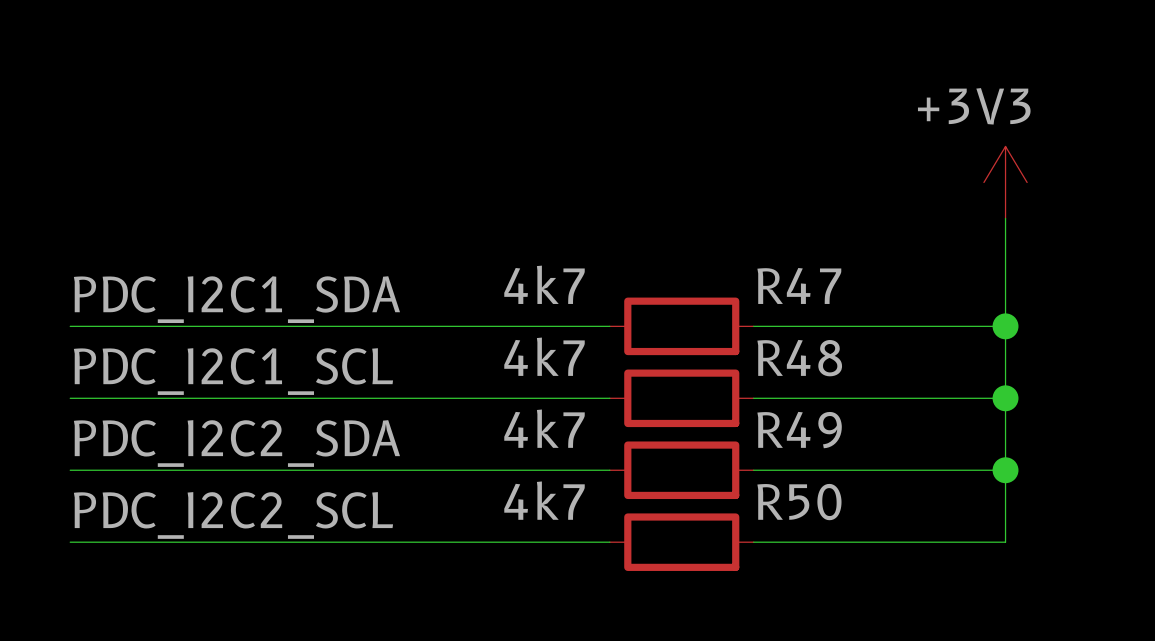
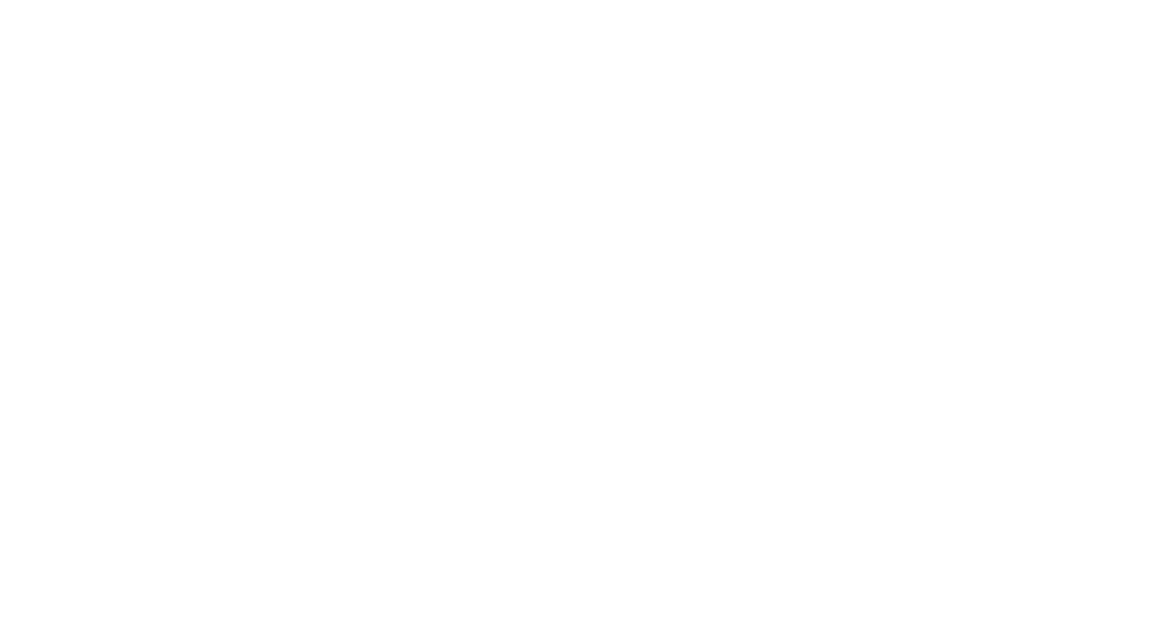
power symbol: +3V3 (1005, 182) -> none
wire: (1005, 218) (1005, 542) (753, 542) -> none
label: PDC_I2C1_SDA (236, 299) -> none
wire: (70, 326) (609, 326) -> none
R47: (681, 326) -> none
wire: (753, 326) (1005, 326) -> none
junction: (1005, 326) -> none
label: PDC_I2C1_SCL (233, 371) -> none
wire: (70, 398) (609, 398) -> none
R48: (681, 398) -> none
wire: (753, 398) (1005, 398) -> none
junction: (1005, 398) -> none
label: PDC_I2C2_SDA (236, 443) -> none
wire: (70, 470) (609, 470) -> none
R49: (681, 470) -> none
wire: (753, 470) (1005, 470) -> none
junction: (1005, 470) -> none
label: PDC_I2C2_SCL (233, 515) -> none
wire: (70, 542) (609, 542) -> none
R50: (681, 542) -> none

